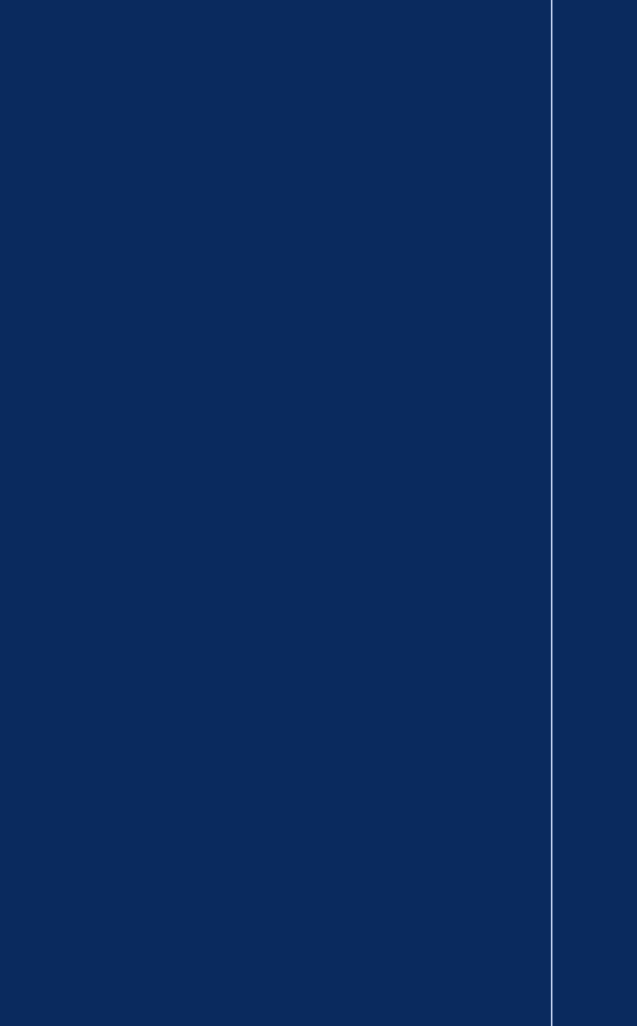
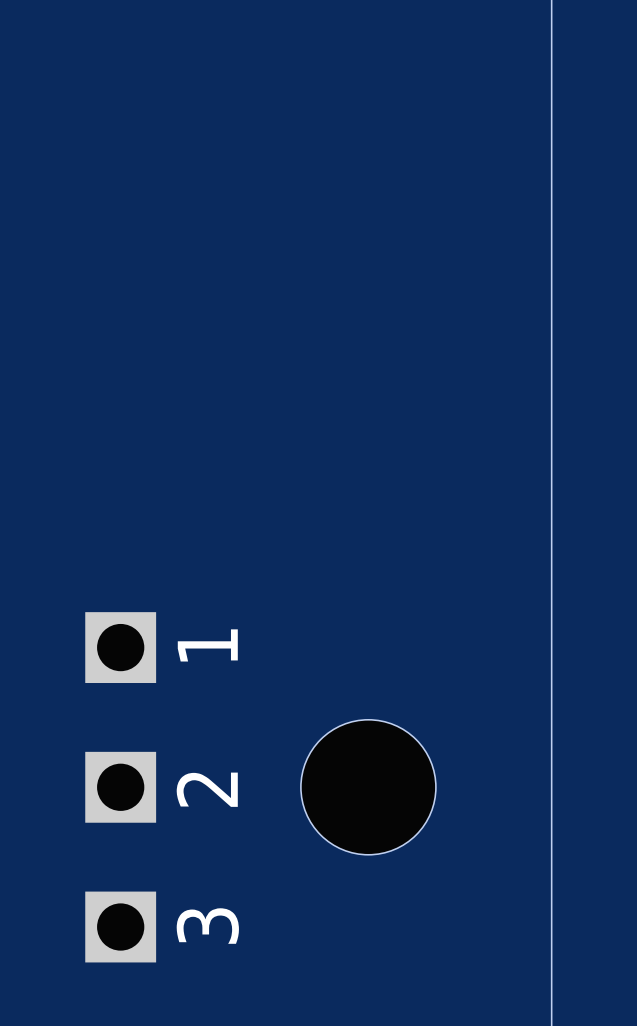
part: none -> (260, 787)

